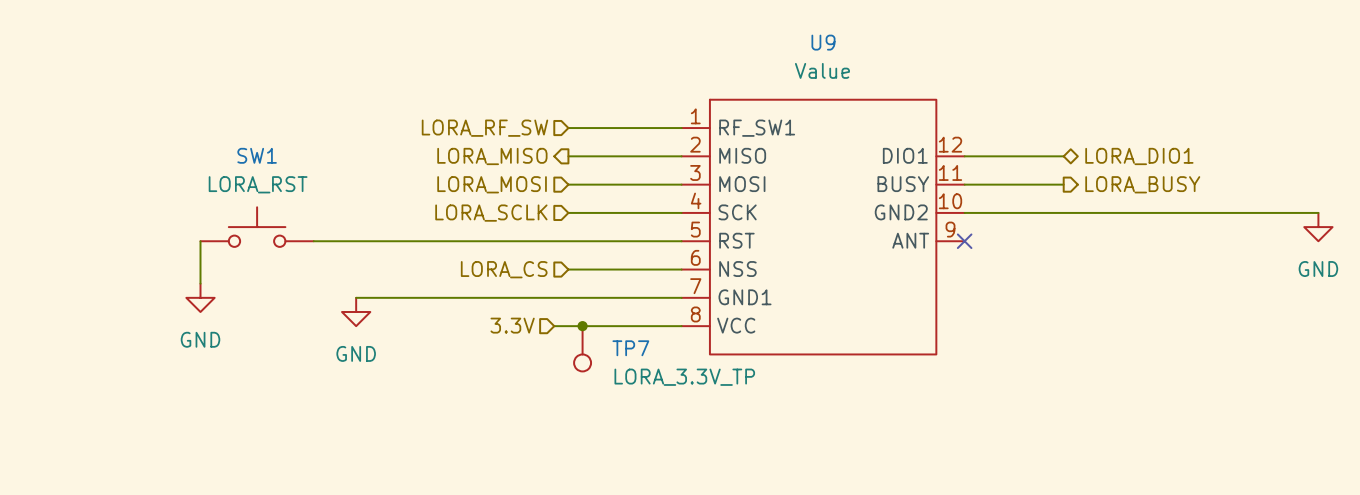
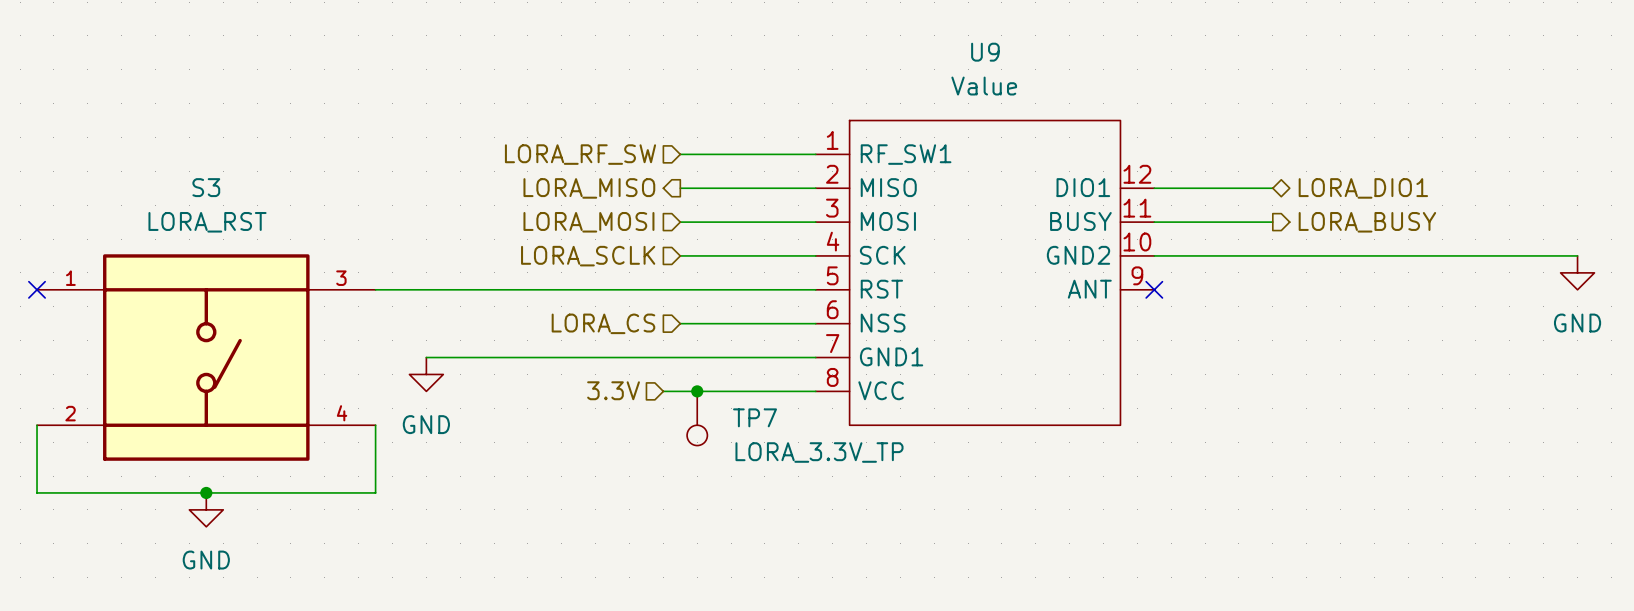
SW1: LORA_RST (257, 227) -> none
no-connect mark: none -> (37, 289)
S3: none -> LORA_RST (206, 357)
power symbol position: GND (200, 297) -> GND (206, 509)
wire: none -> (37, 425) (37, 492) (375, 492) (375, 425)
junction: none -> (206, 492)

